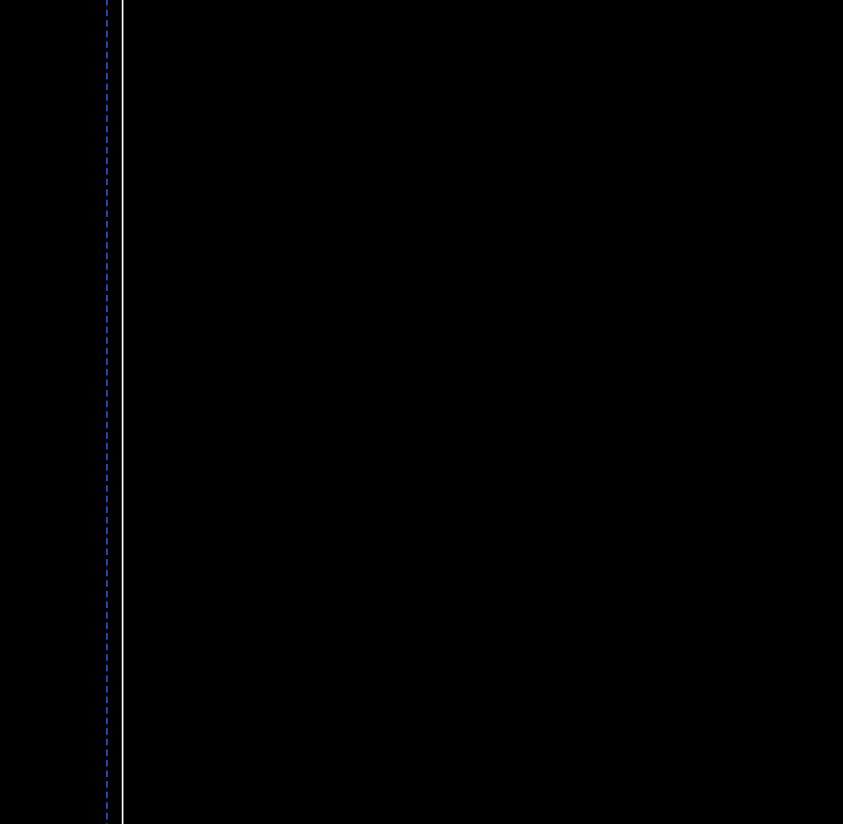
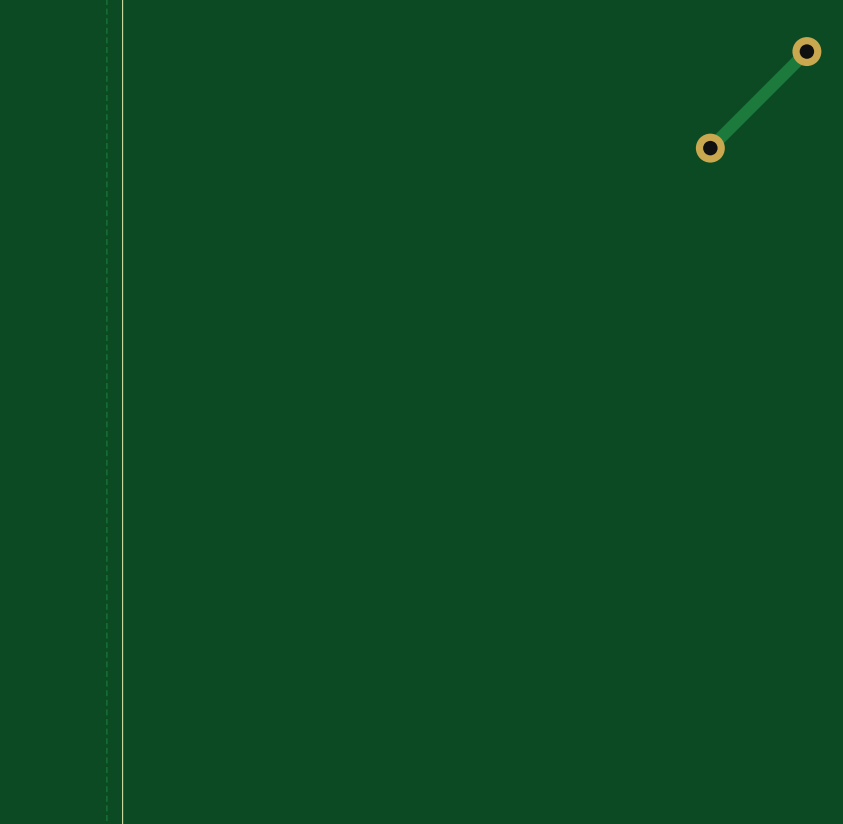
track: none -> (806, 51) (710, 148)
via: none -> (806, 51)
via: none -> (710, 148)

